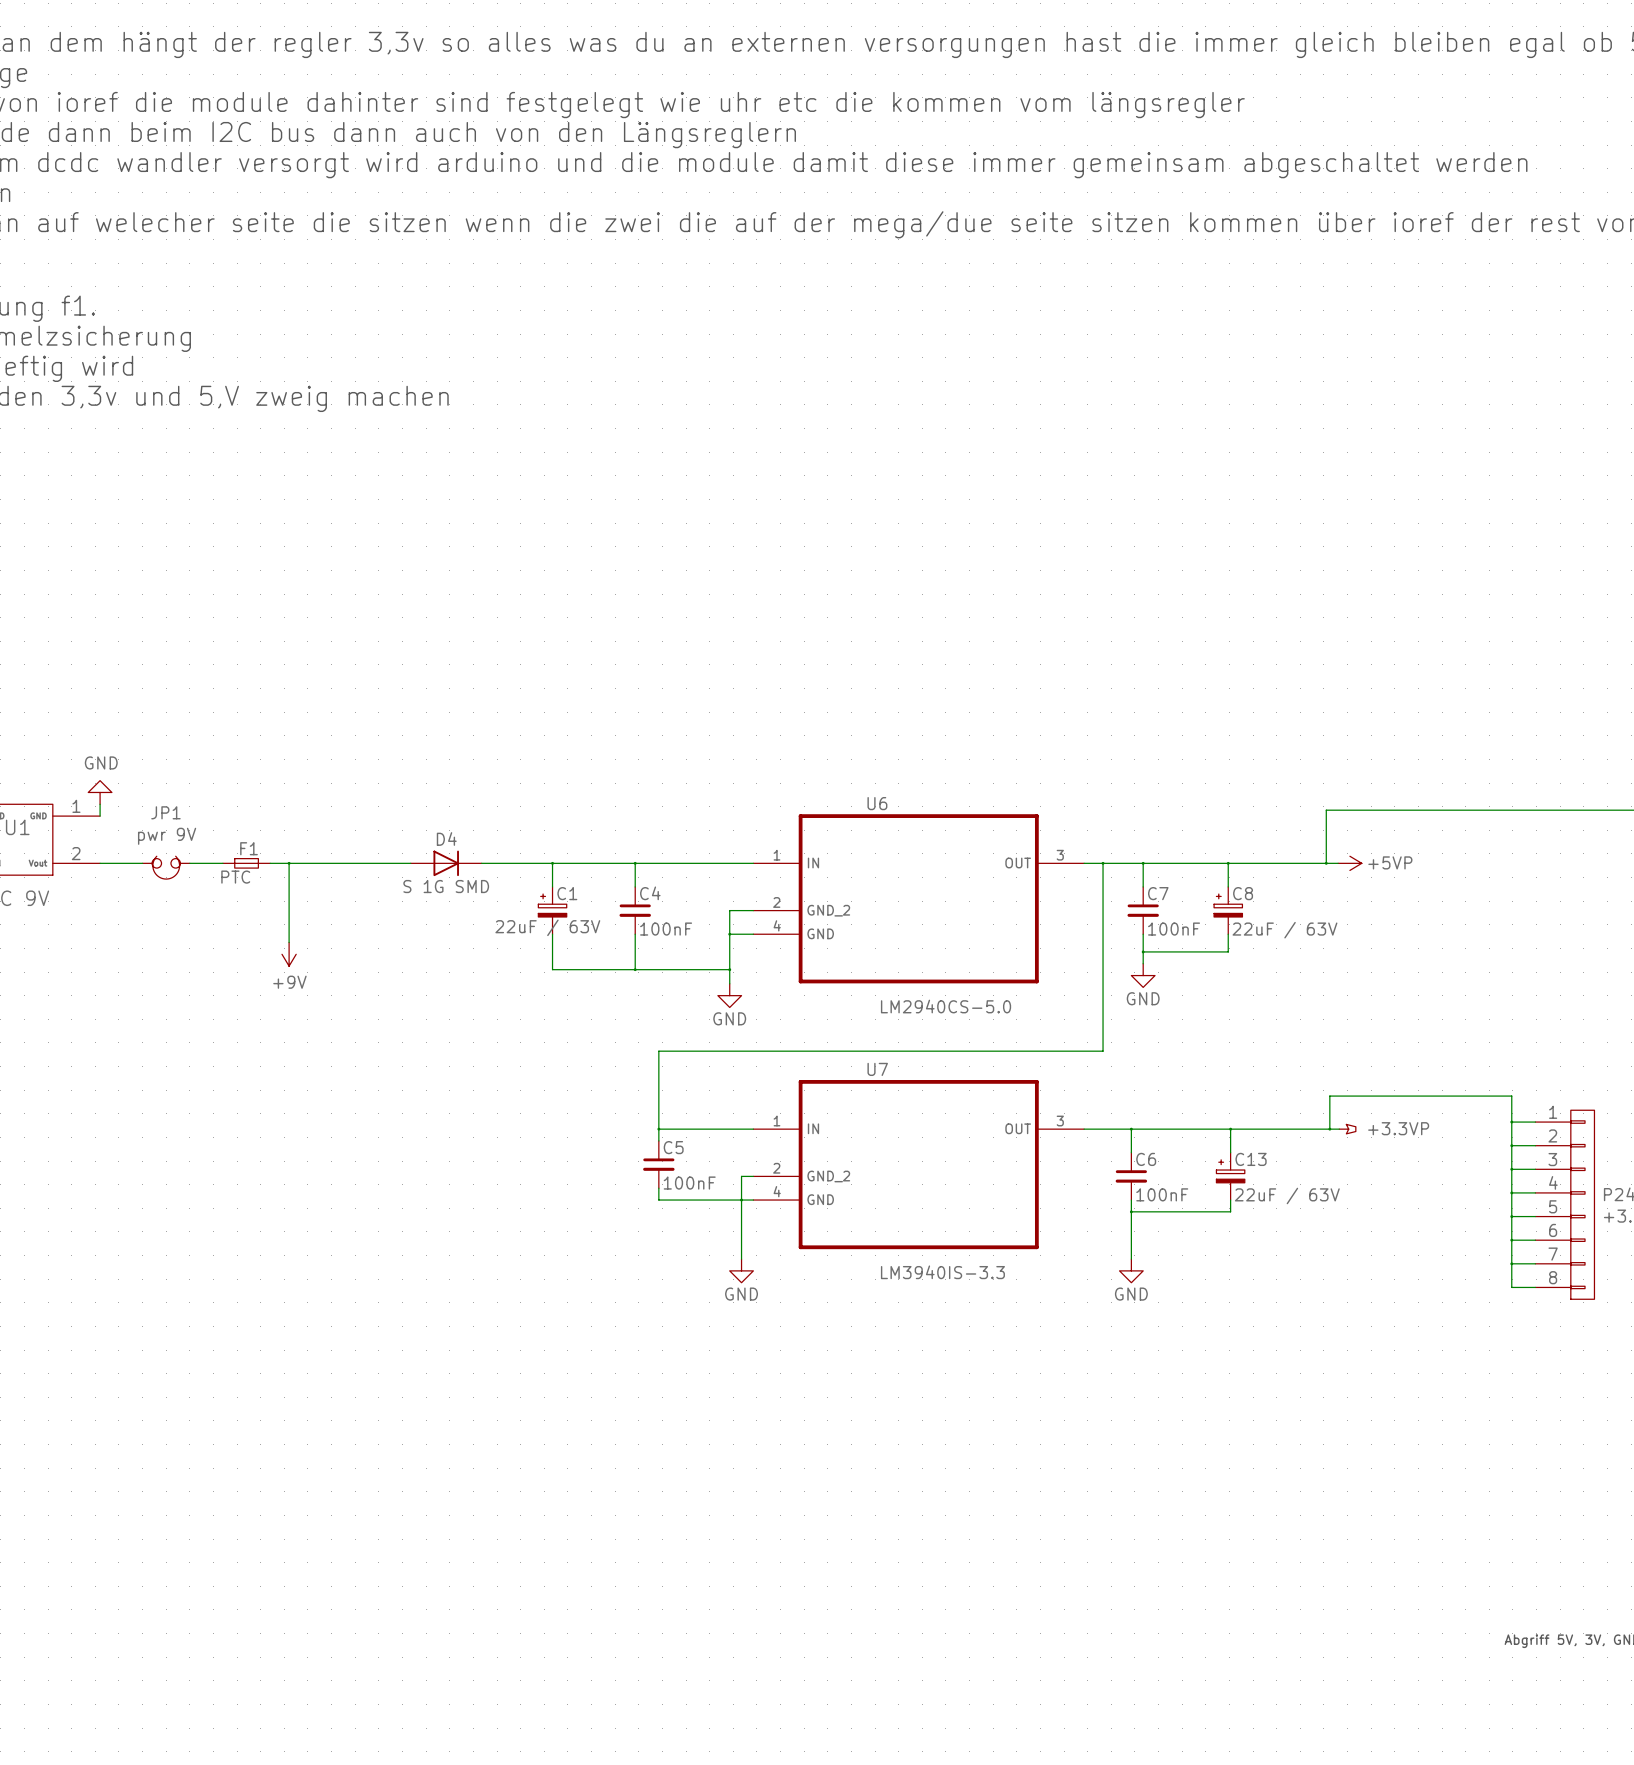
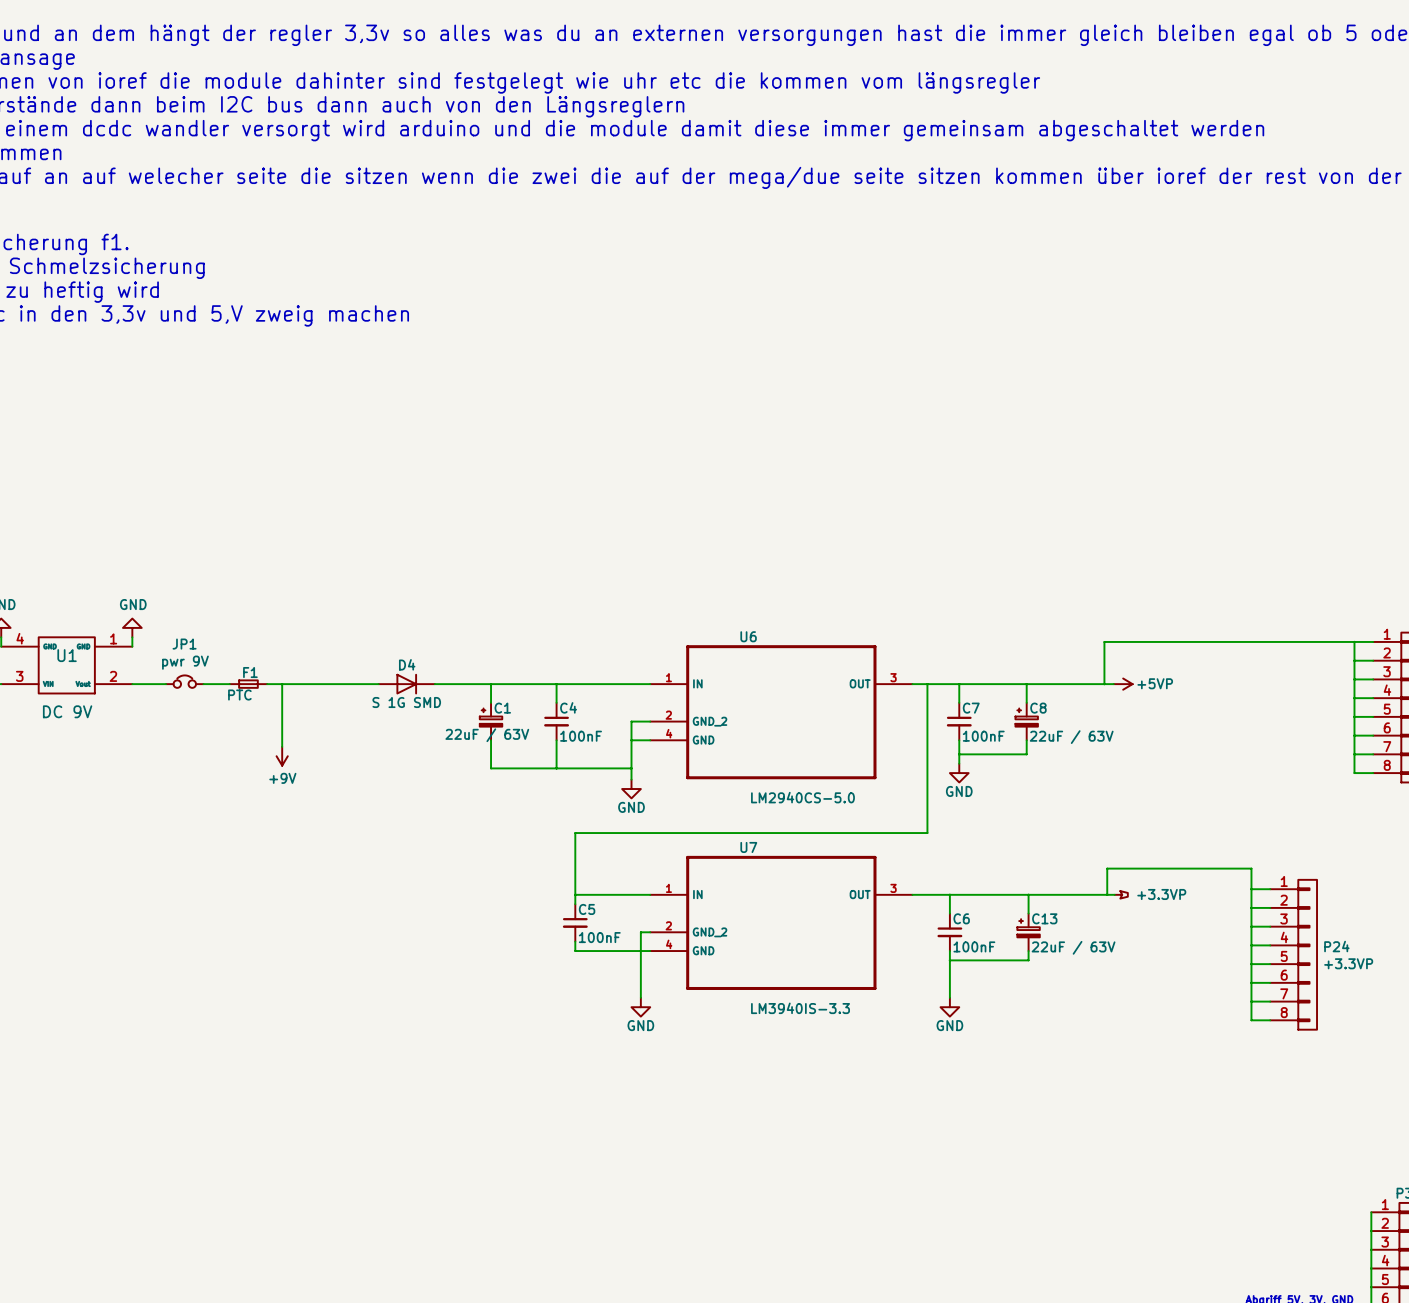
JP1 symbol: [142, 856, 190, 880] -> [166, 675, 204, 688]

